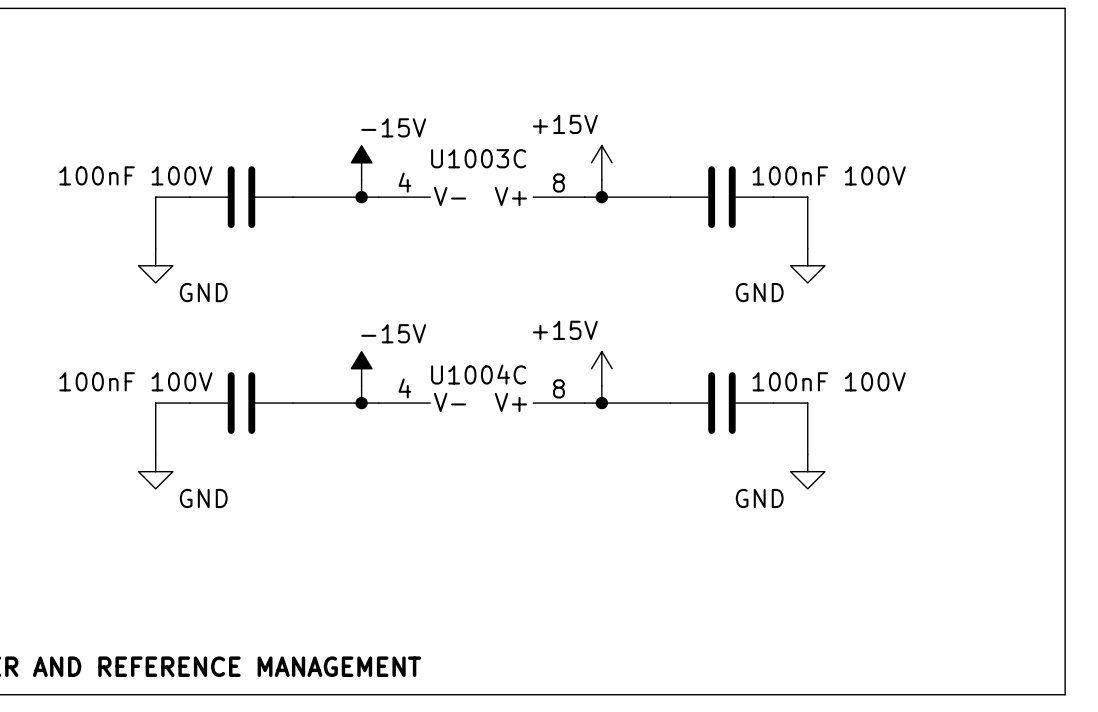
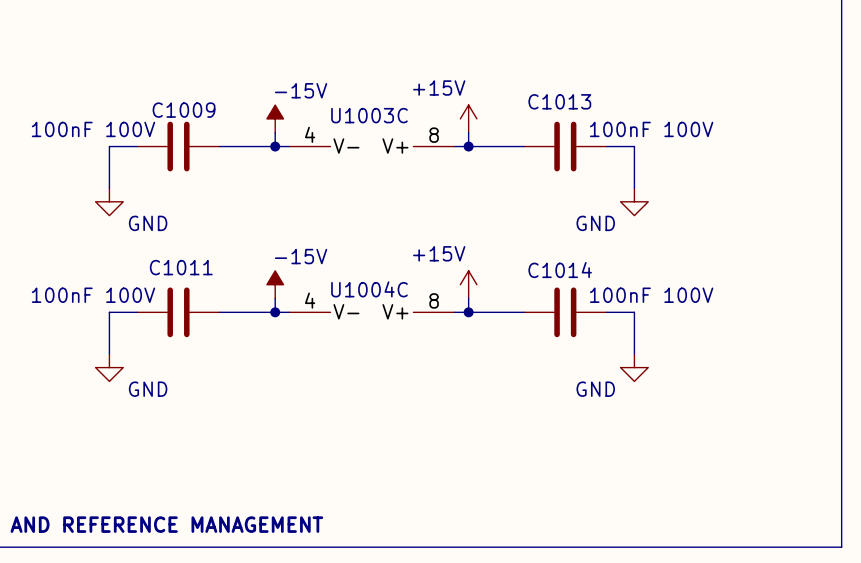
C1013 name: none -> C1013 (559, 101)
C1009 name: none -> C1009 (184, 110)
C1011 name: none -> C1011 (181, 267)
C1014 name: none -> C1014 (560, 270)

